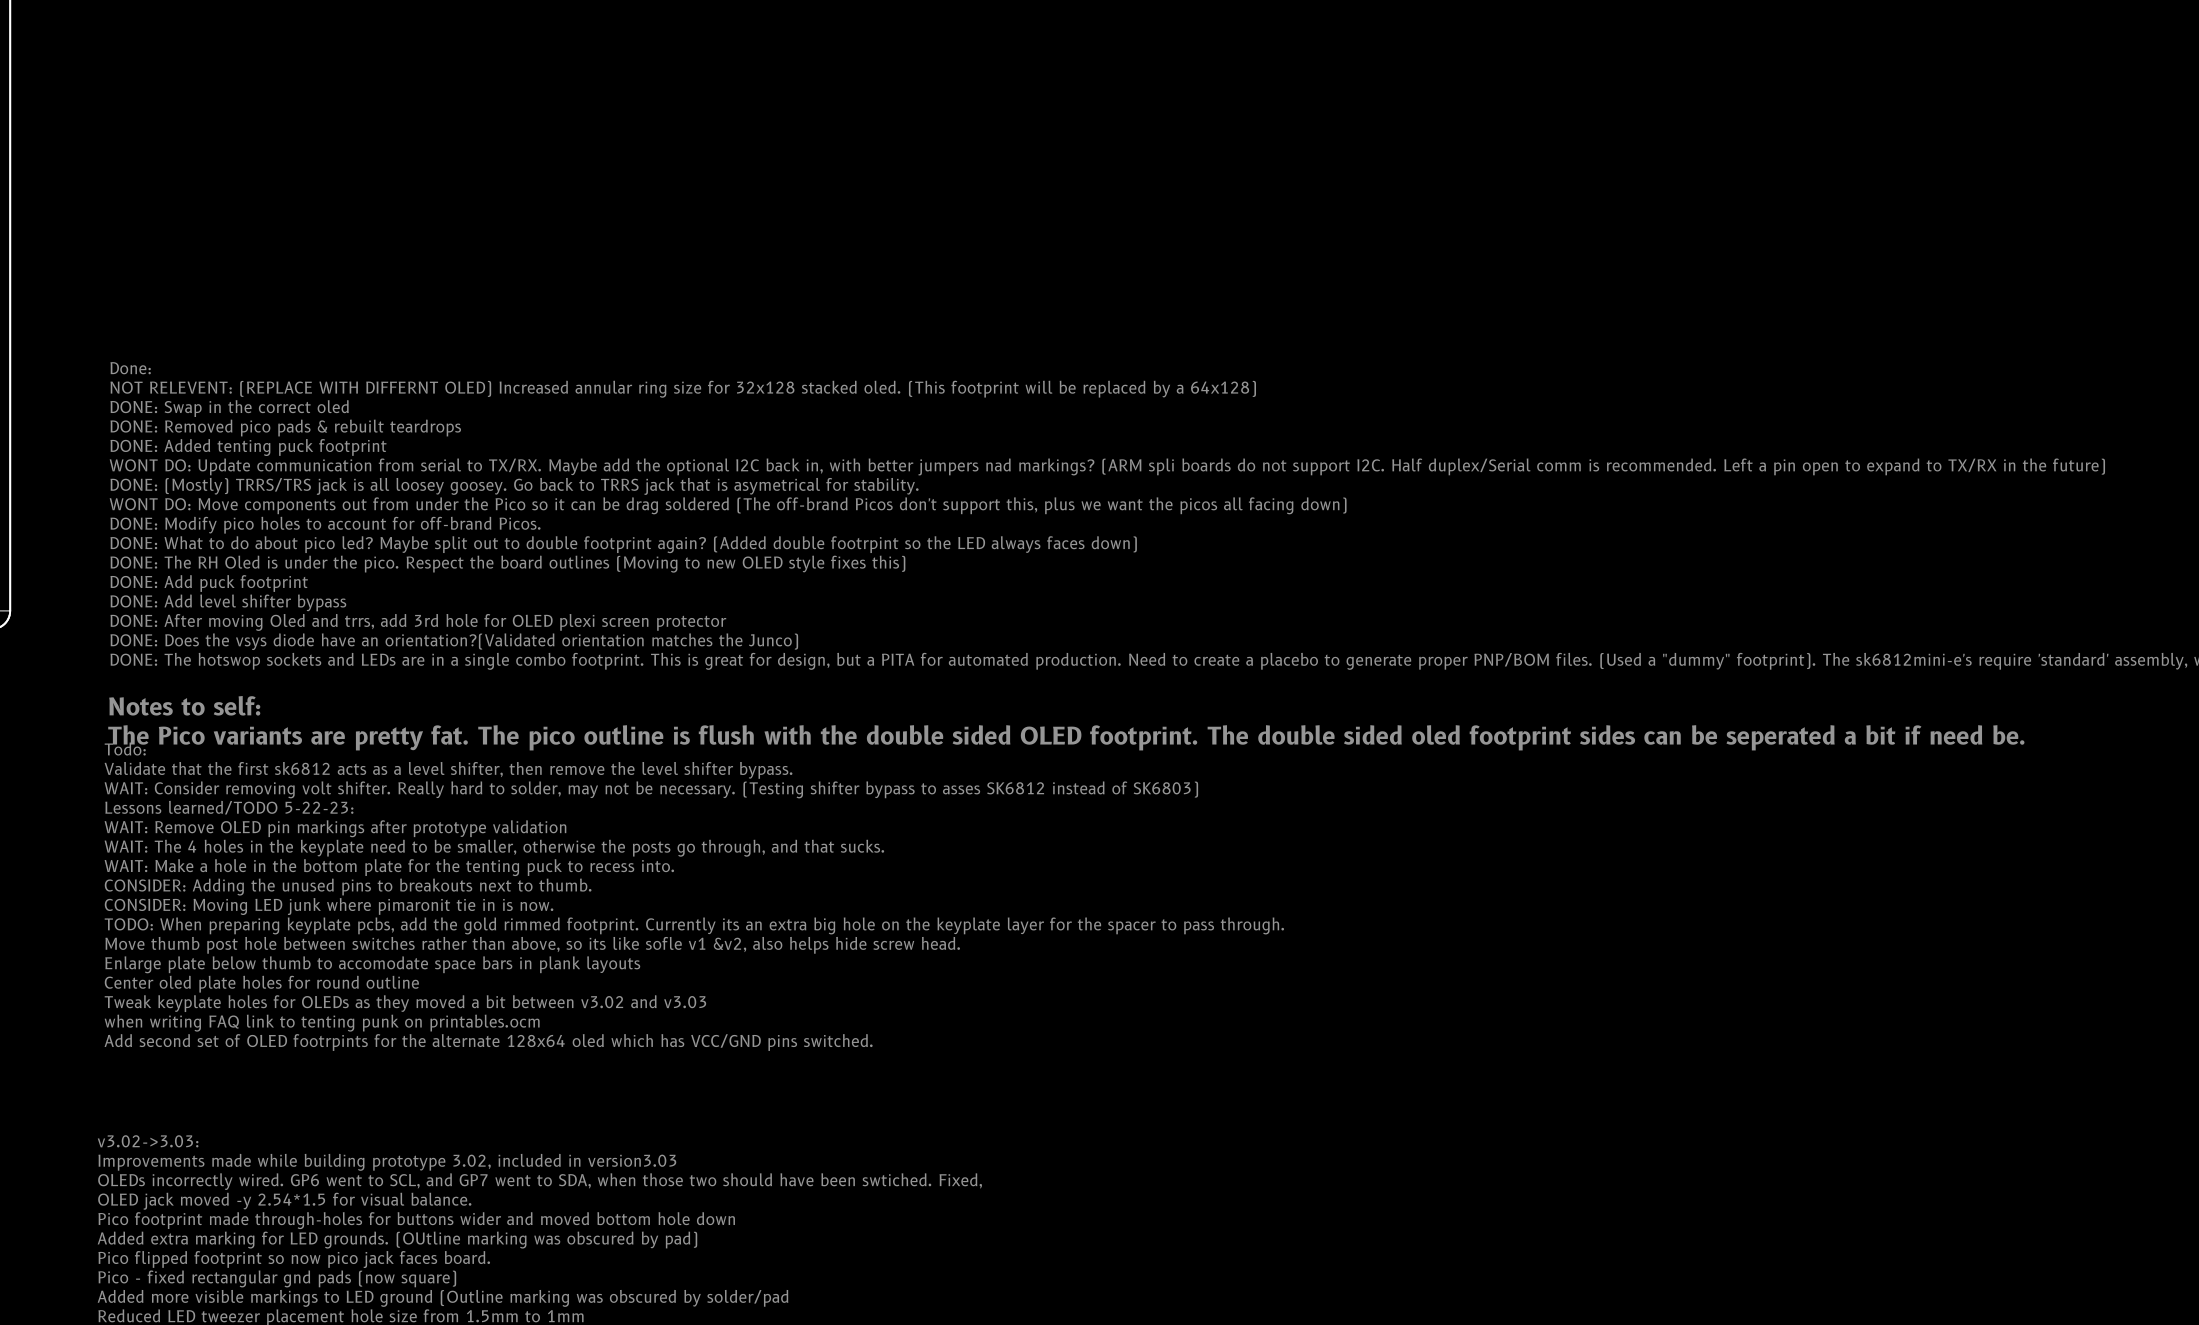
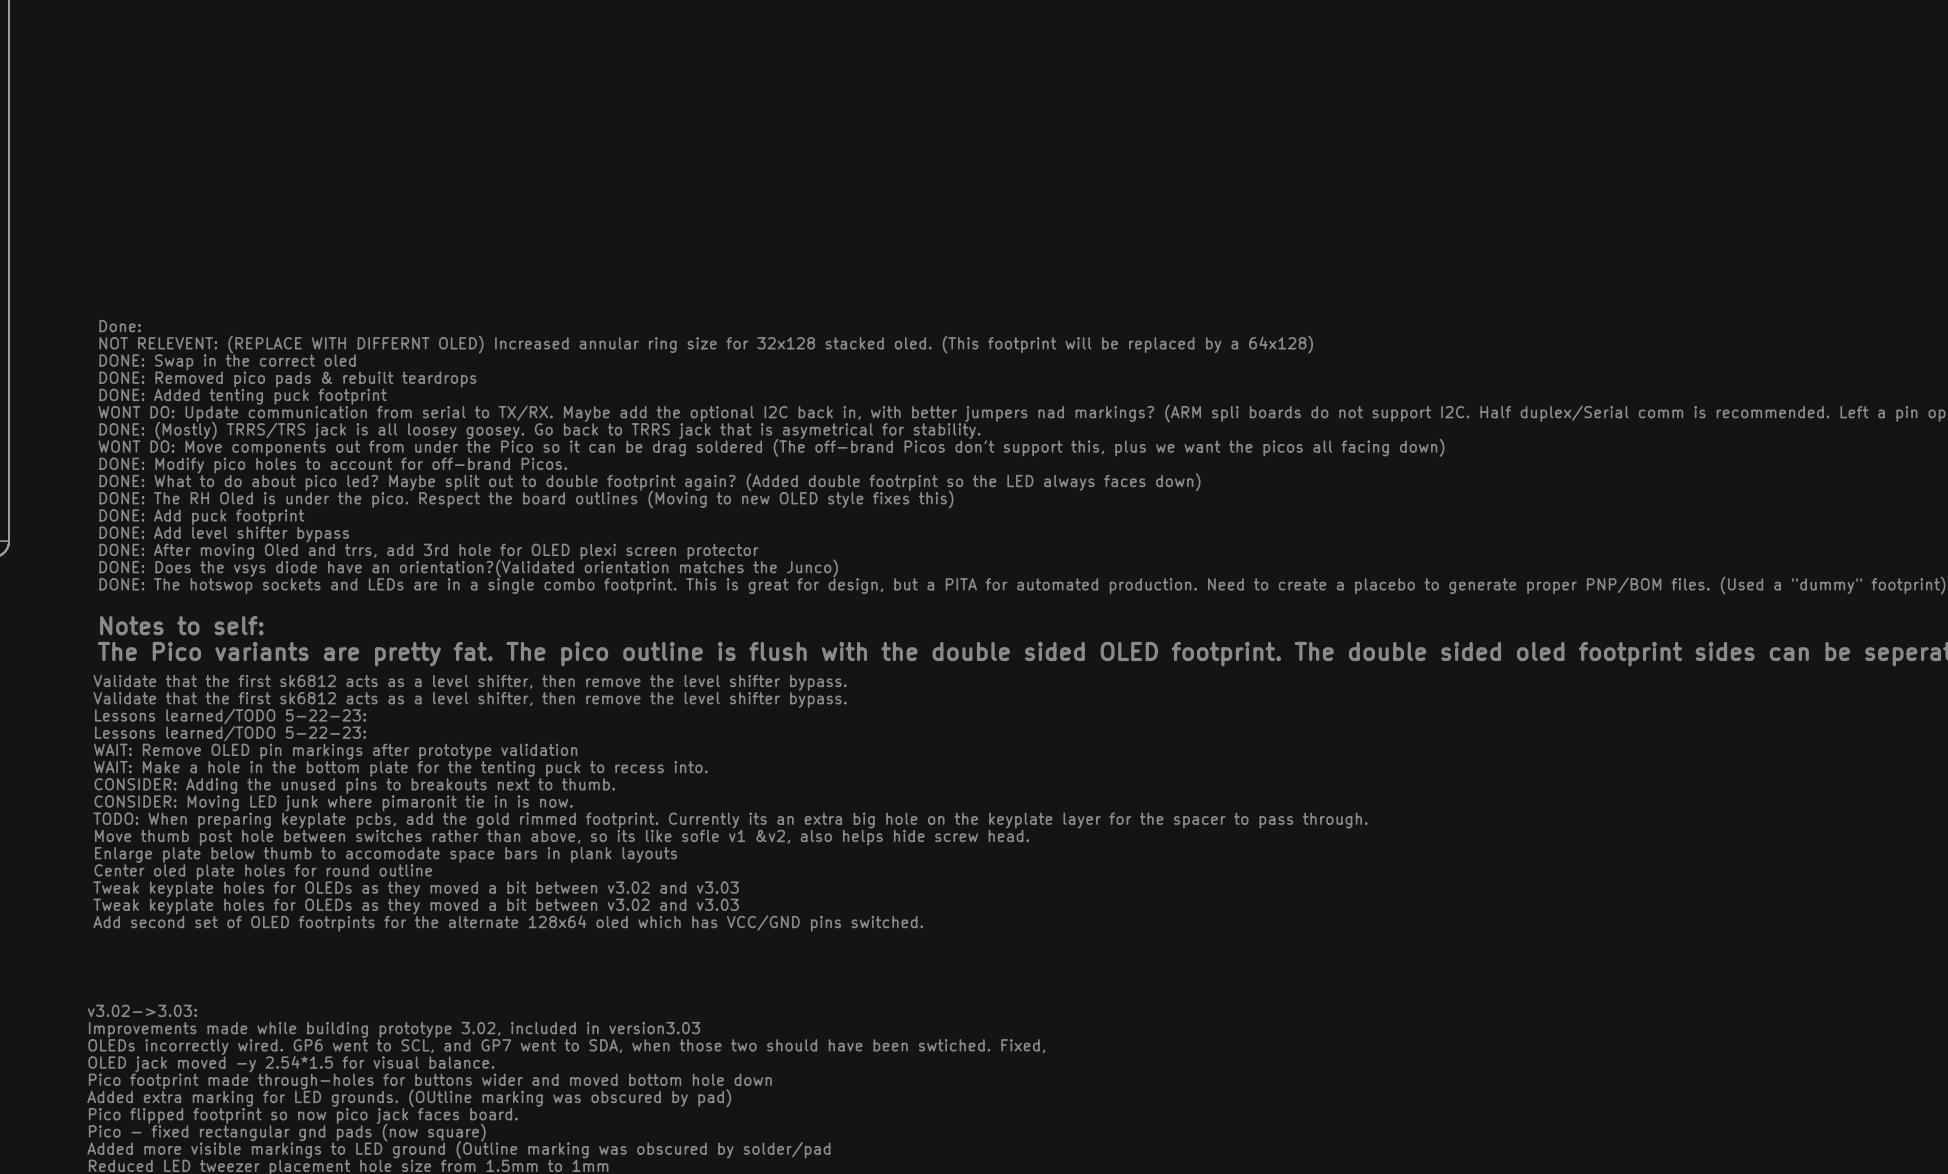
text: Todo: (125, 749) -> none
text: WAIT: Consider removing volt shifter. Really hard to solder, may not be necessary. (Testing shifter bypass to asses SK6812 instead of SK6803) (651, 789) -> Validate that the first sk6812 acts as a level shifter, then remove the level shifter bypass. (470, 699)
text: WAIT: Remove OLED pin markings after prototype validation (335, 828) -> Lessons learned/TODO 5-22-23: (230, 733)
text: WAIT: The 4 holes in the keyplate need to be smaller, otherwise the posts go through, and that sucks. (494, 848) -> WAIT: Remove OLED pin markings after prototype validation (335, 751)
text: when writing FAQ link to tenting punk on printables.ocm (322, 1023) -> Tweak keyplate holes for OLEDs as they moved a bit between v3.02 and v3.03 (416, 906)

